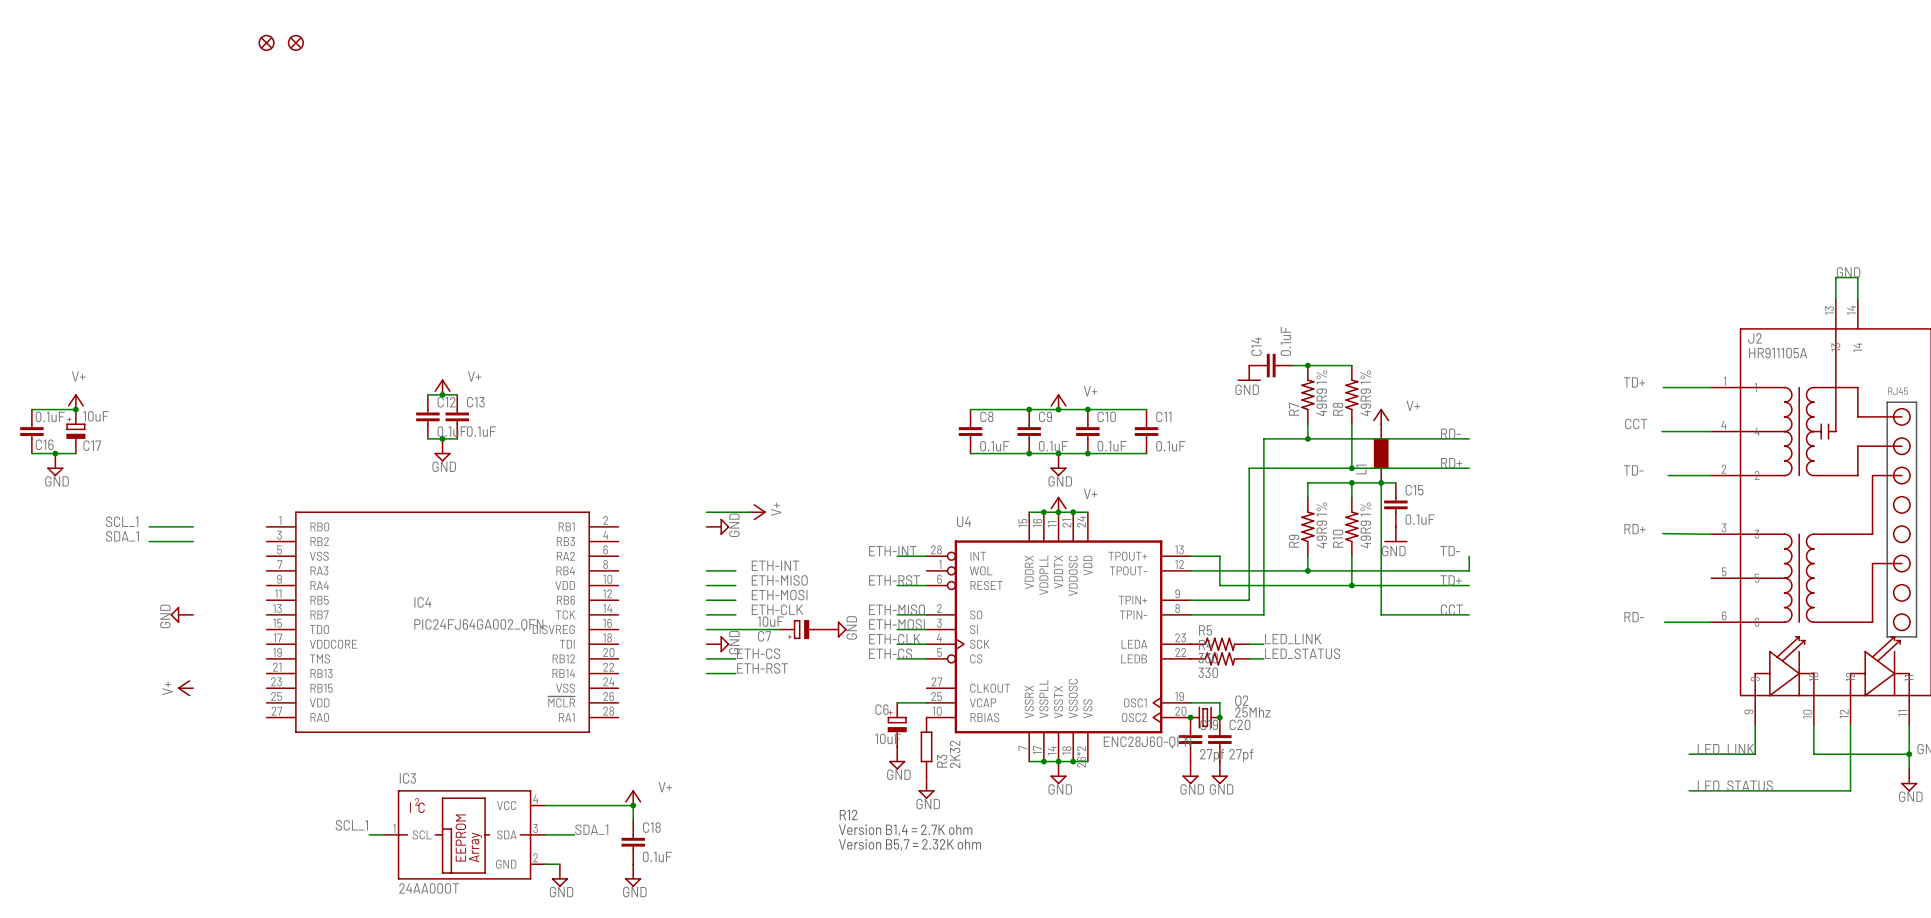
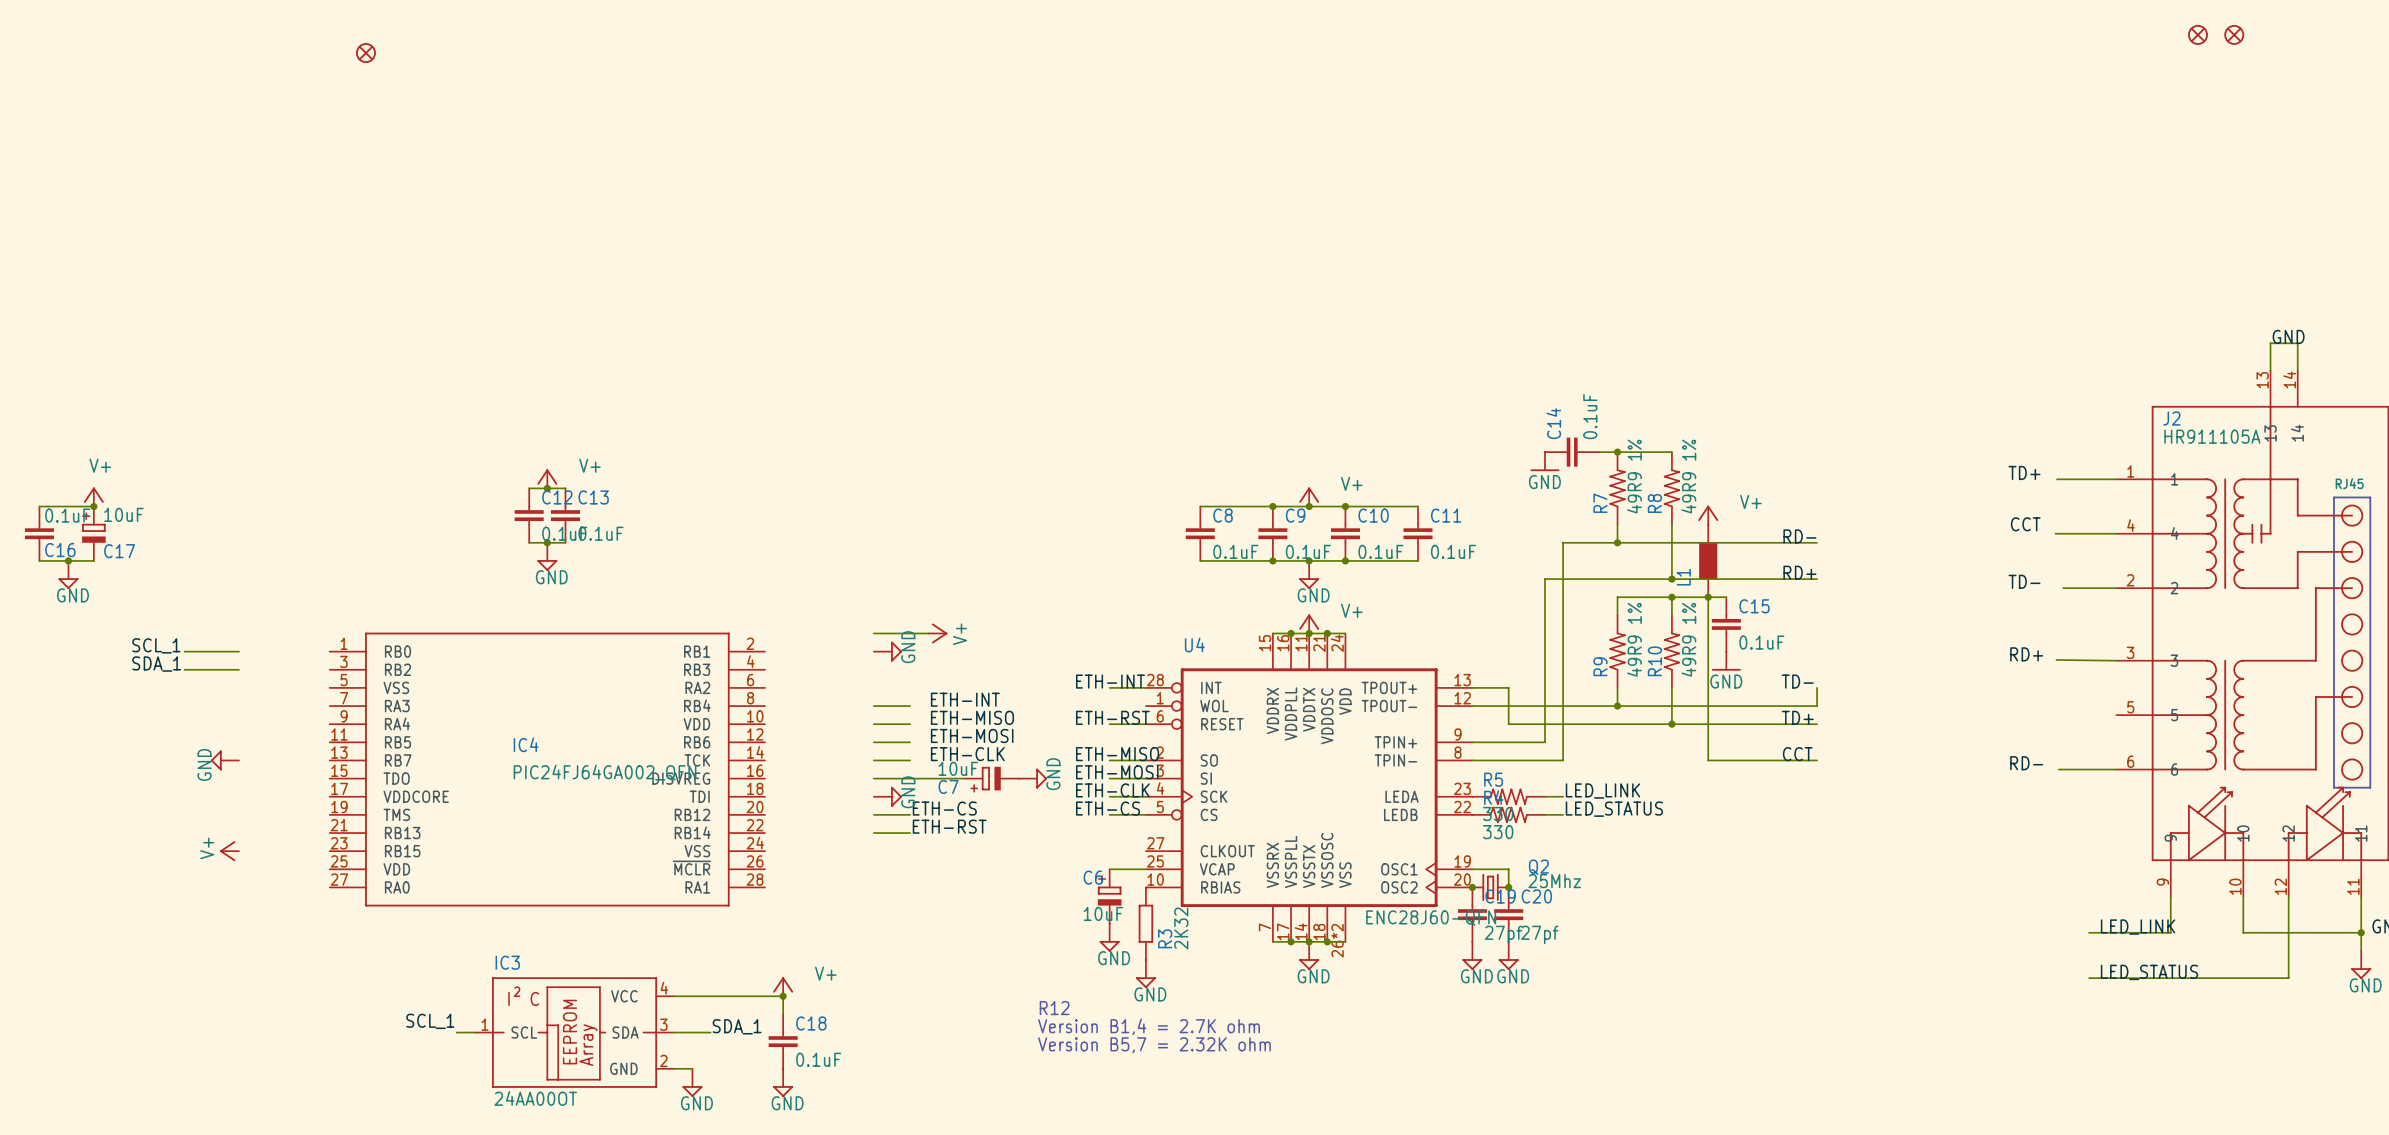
part: none -> (2197, 34)
part: none -> (2234, 34)
part: (266, 42) -> none

